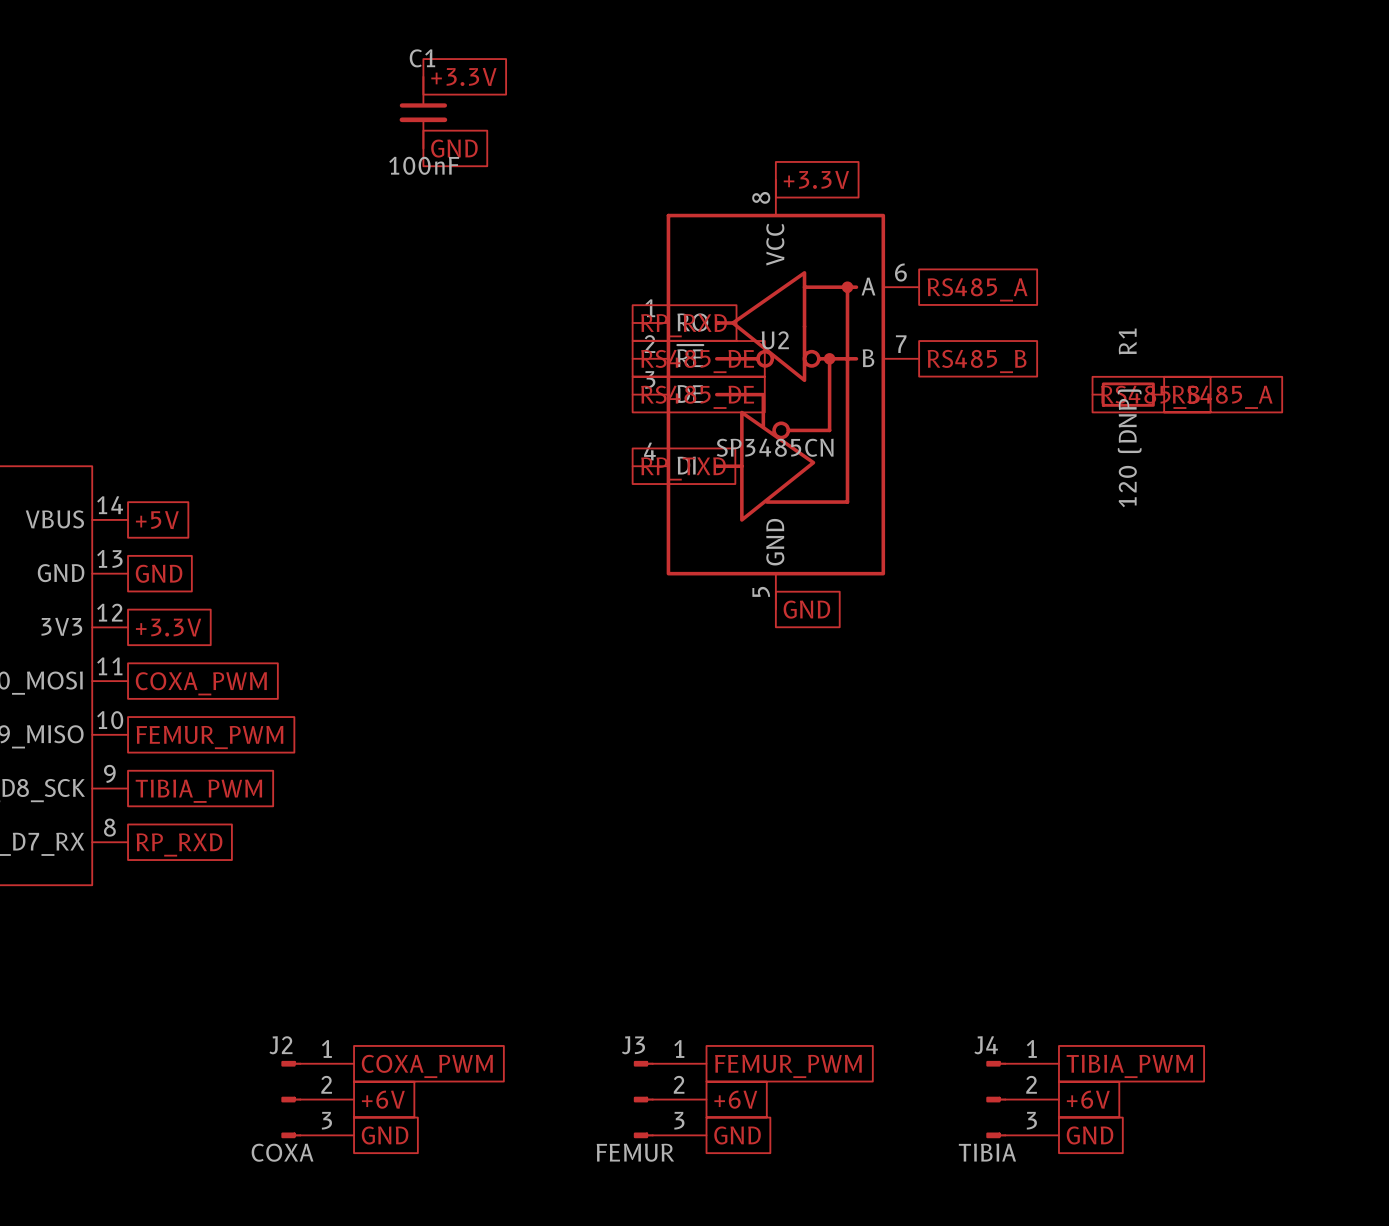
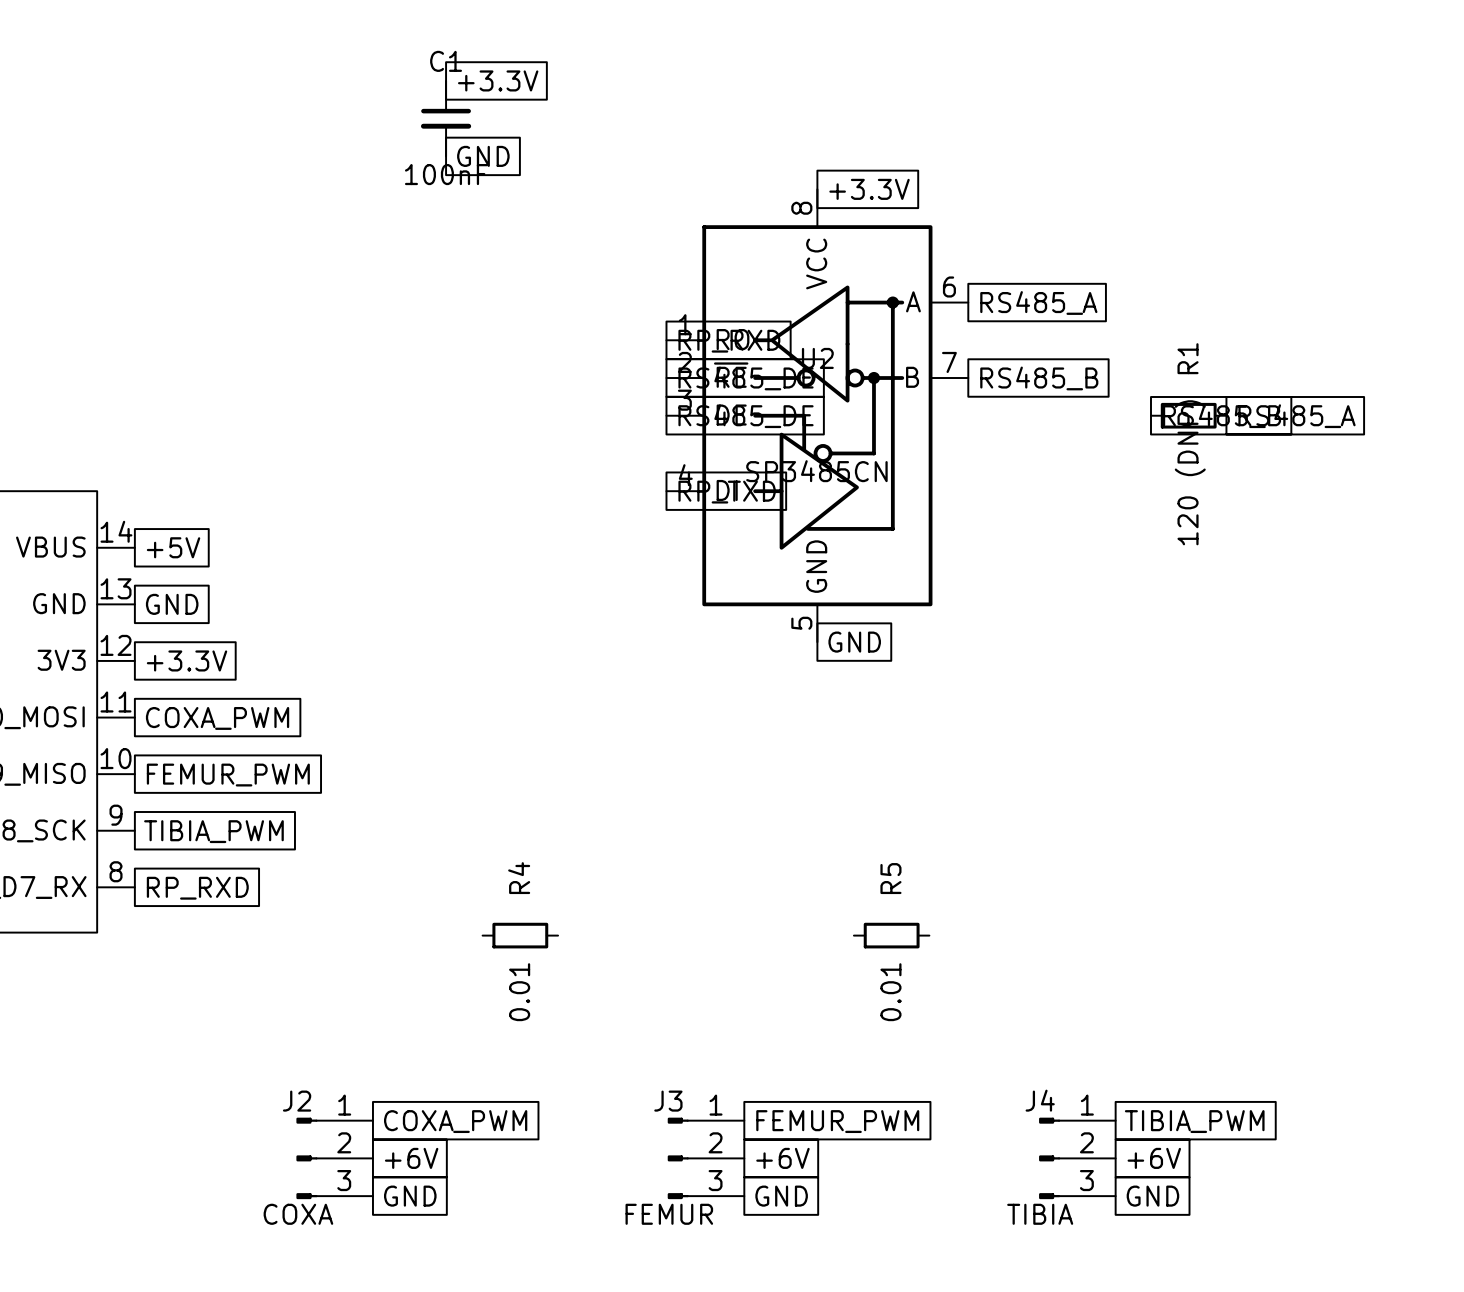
R4: none -> 0.01 (520, 935)
R5: none -> 0.01 (891, 935)

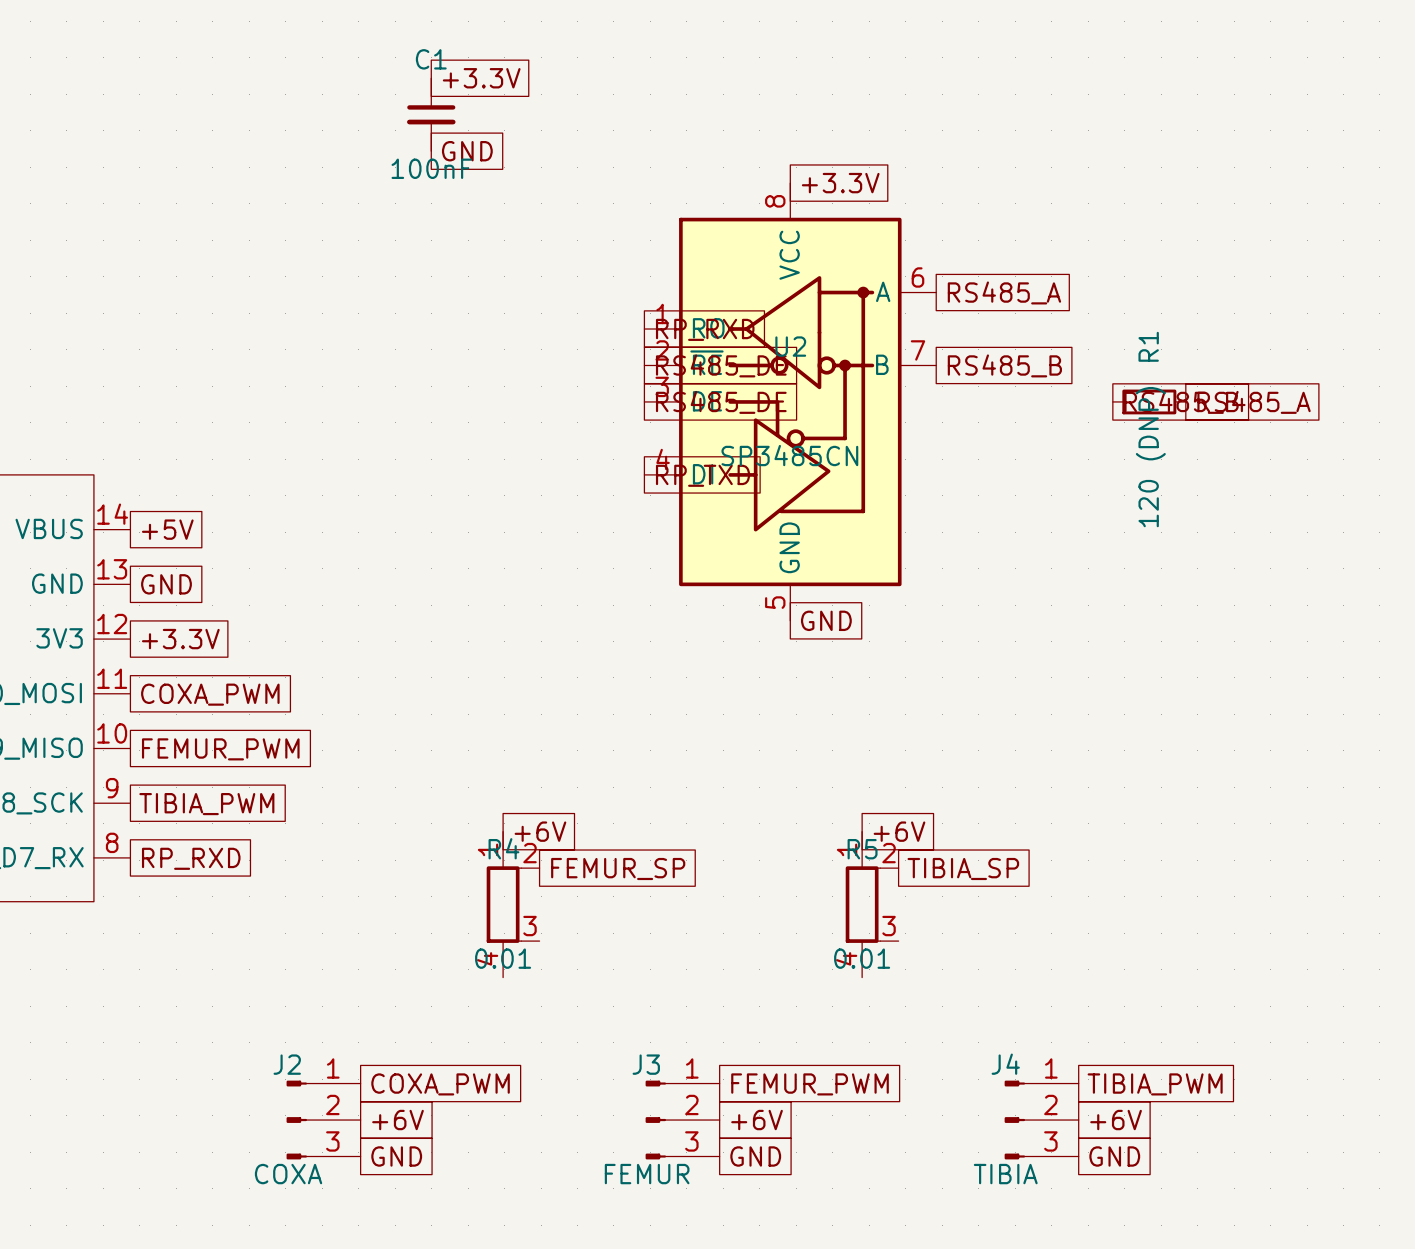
global label: none -> +6V (540, 831)
global label: none -> +6V (899, 831)
global label: none -> FEMUR_SP (618, 868)
global label: none -> TIBIA_SP (963, 868)
R4 symbol: [482, 922, 559, 949] -> [486, 831, 540, 978]
R5 symbol: [853, 922, 930, 949] -> [845, 831, 899, 978]

